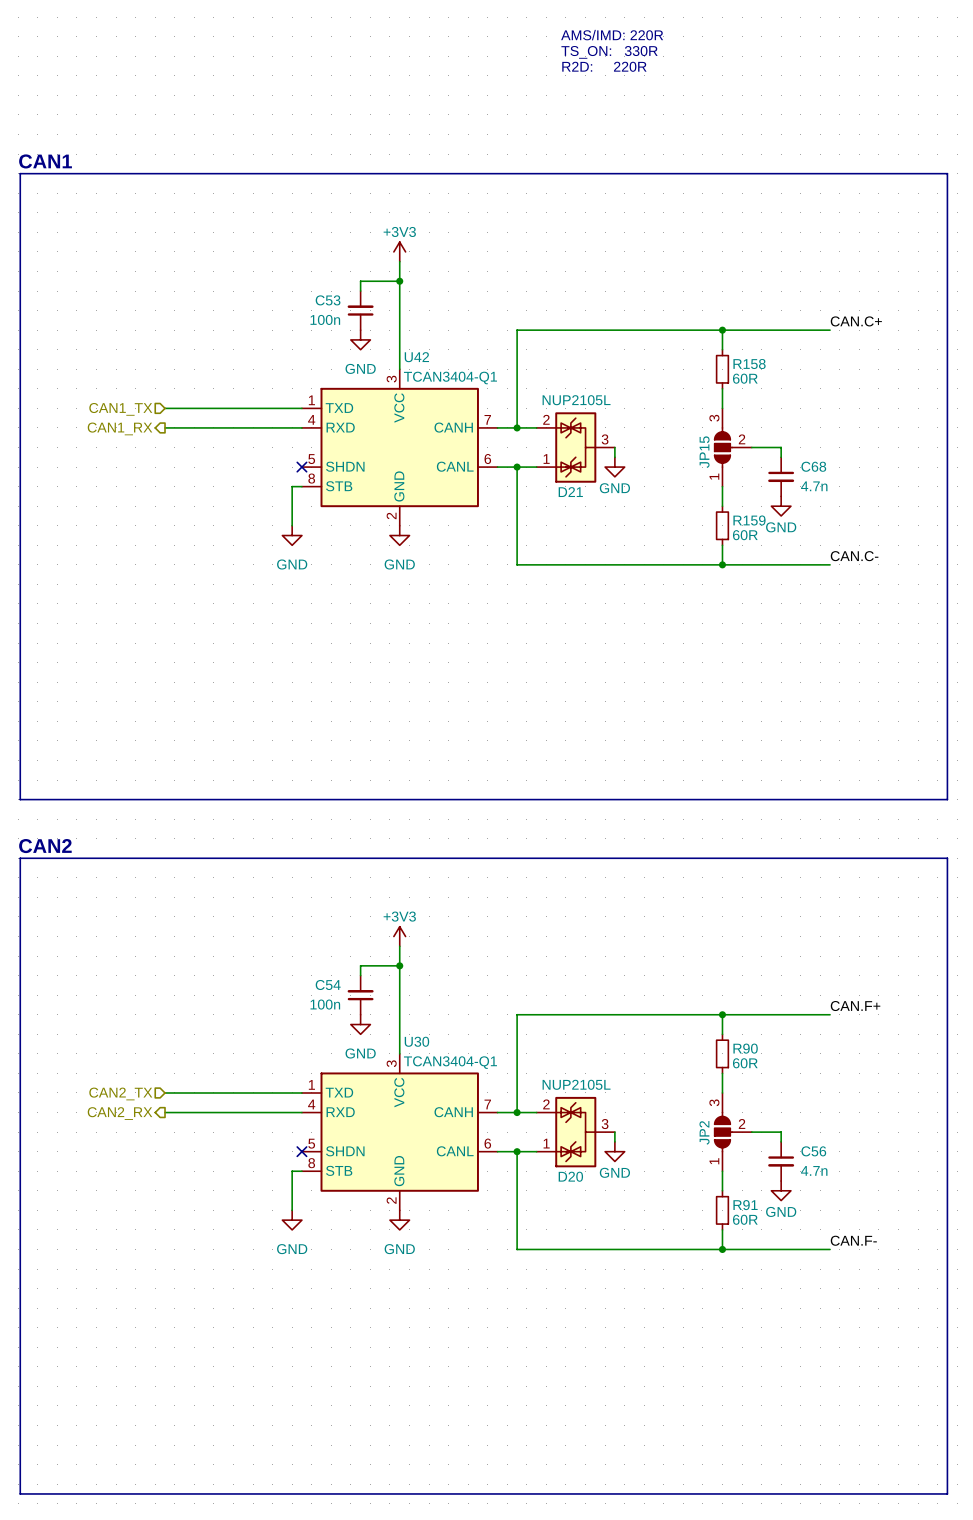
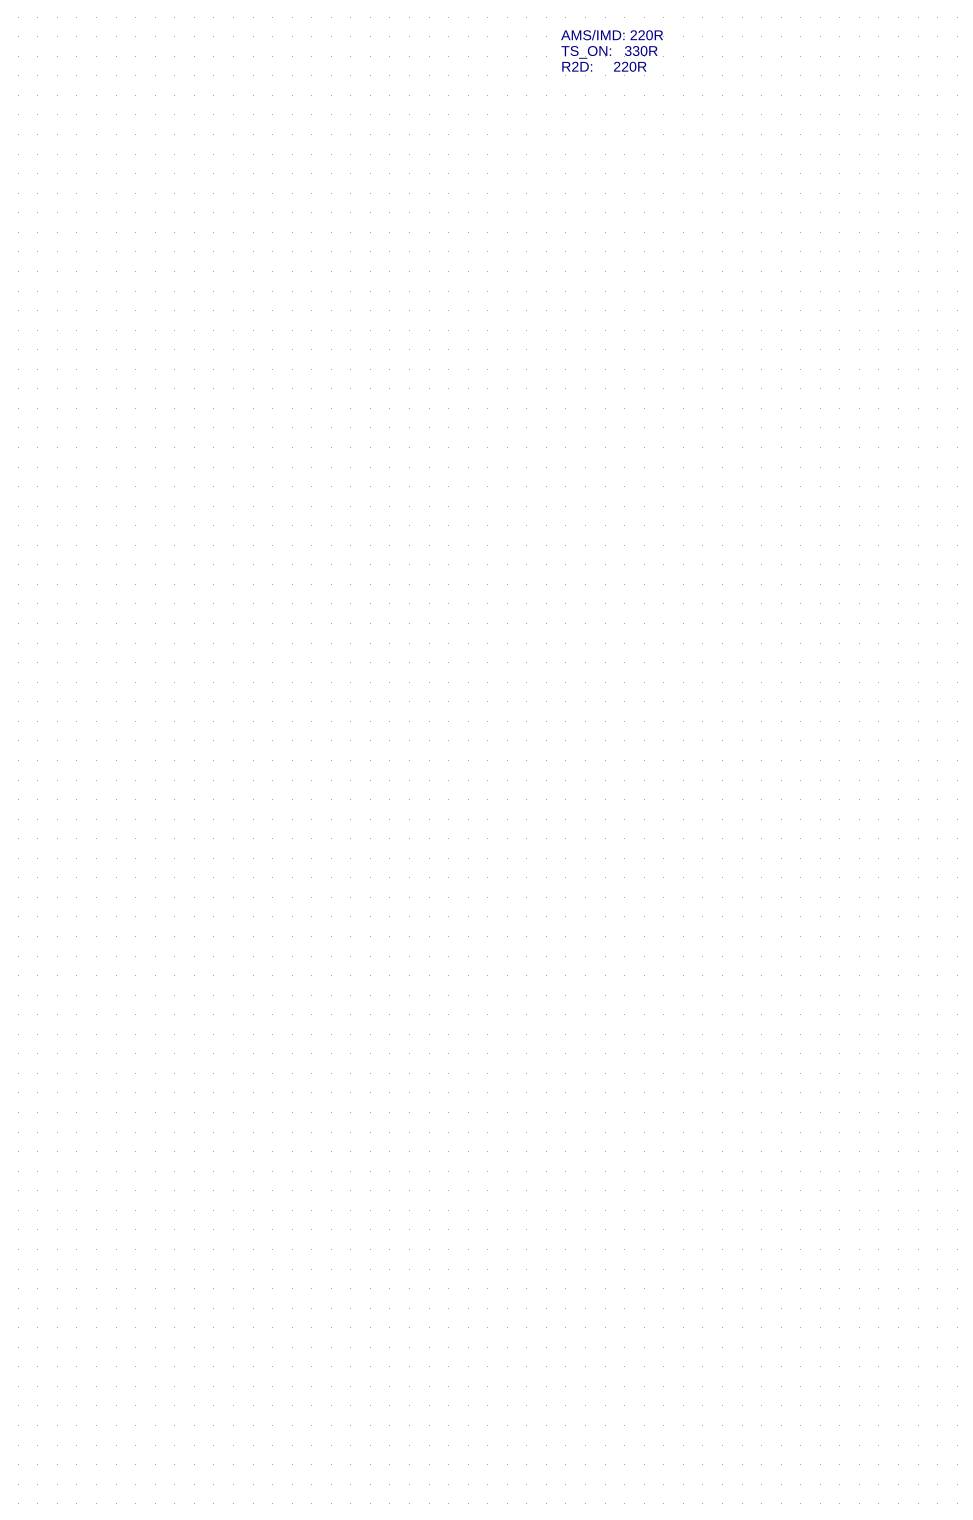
text: CAN1 (45, 161) -> none
line: (20, 173) (20, 799) (947, 799) (947, 173) (20, 173) -> none
power symbol: +3V3 (399, 251) -> none
wire: (399, 261) (399, 369) -> none
wire: (399, 281) (360, 281) (360, 291) -> none
junction: (399, 281) -> none
C53: 100n (360, 310) -> none
label: CAN.C+ (856, 321) -> none
wire: (722, 330) (722, 349) -> none
junction: (722, 330) -> none
wire: (830, 330) (517, 330) (517, 427) -> none
power symbol: GND (360, 339) -> none
R158: 60R (722, 369) -> none
wire: (722, 388) (722, 408) -> none
wire: (165, 408) (301, 408) -> none
hierarchical label: CAN1_TX (120, 409) -> none
wire: (165, 427) (301, 427) -> none
wire: (497, 427) (536, 427) -> none
junction: (517, 427) -> none
hierarchical label: CAN1_RX (120, 428) -> none
U42: TCAN3404-Q1 (399, 447) -> none
D21: NUP2105L (575, 447) -> none
wire: (614, 447) (614, 457) -> none
JP15: (733, 447) -> none
wire: (751, 447) (781, 447) (781, 457) -> none
no-connect mark: (301, 467) -> none
wire: (497, 467) (536, 467) -> none
wire: (517, 467) (517, 564) (830, 564) -> none
junction: (517, 467) -> none
power symbol: GND (614, 467) -> none
C68: 4.7n (781, 476) -> none
wire: (301, 486) (292, 486) (292, 525) -> none
wire: (722, 486) (722, 506) -> none
power symbol: GND (781, 506) -> none
R159: 60R (722, 525) -> none
power symbol: GND (292, 535) -> none
power symbol: GND (399, 535) -> none
wire: (722, 545) (722, 564) -> none
label: CAN.C- (854, 556) -> none
junction: (722, 564) -> none
text: CAN2 (45, 846) -> none
line: (20, 858) (947, 858) (947, 1493) (20, 1493) (20, 858) -> none
power symbol: +3V3 (399, 936) -> none
wire: (399, 946) (399, 1053) -> none
wire: (399, 965) (360, 965) (360, 975) -> none
junction: (399, 965) -> none
C54: 100n (360, 995) -> none
label: CAN.F+ (855, 1006) -> none
wire: (722, 1014) (722, 1034) -> none
junction: (722, 1014) -> none
wire: (830, 1014) (517, 1014) (517, 1112) -> none
power symbol: GND (360, 1024) -> none
R90: 60R (722, 1053) -> none
wire: (722, 1073) (722, 1092) -> none
wire: (165, 1092) (301, 1092) -> none
hierarchical label: CAN2_TX (120, 1093) -> none
wire: (165, 1112) (301, 1112) -> none
wire: (497, 1112) (536, 1112) -> none
junction: (517, 1112) -> none
hierarchical label: CAN2_RX (120, 1113) -> none
U30: TCAN3404-Q1 (399, 1132) -> none
D20: NUP2105L (575, 1132) -> none
wire: (614, 1132) (614, 1141) -> none
JP2: (733, 1132) -> none
wire: (751, 1132) (781, 1132) (781, 1141) -> none
no-connect mark: (301, 1151) -> none
wire: (497, 1151) (536, 1151) -> none
wire: (517, 1151) (517, 1249) (830, 1249) -> none
junction: (517, 1151) -> none
power symbol: GND (614, 1151) -> none
C56: 4.7n (781, 1161) -> none
wire: (301, 1171) (292, 1171) (292, 1210) -> none
wire: (722, 1171) (722, 1190) -> none
power symbol: GND (781, 1190) -> none
R91: 60R (722, 1210) -> none
power symbol: GND (292, 1220) -> none
power symbol: GND (399, 1220) -> none
wire: (722, 1229) (722, 1249) -> none
label: CAN.F- (853, 1240) -> none
junction: (722, 1249) -> none

